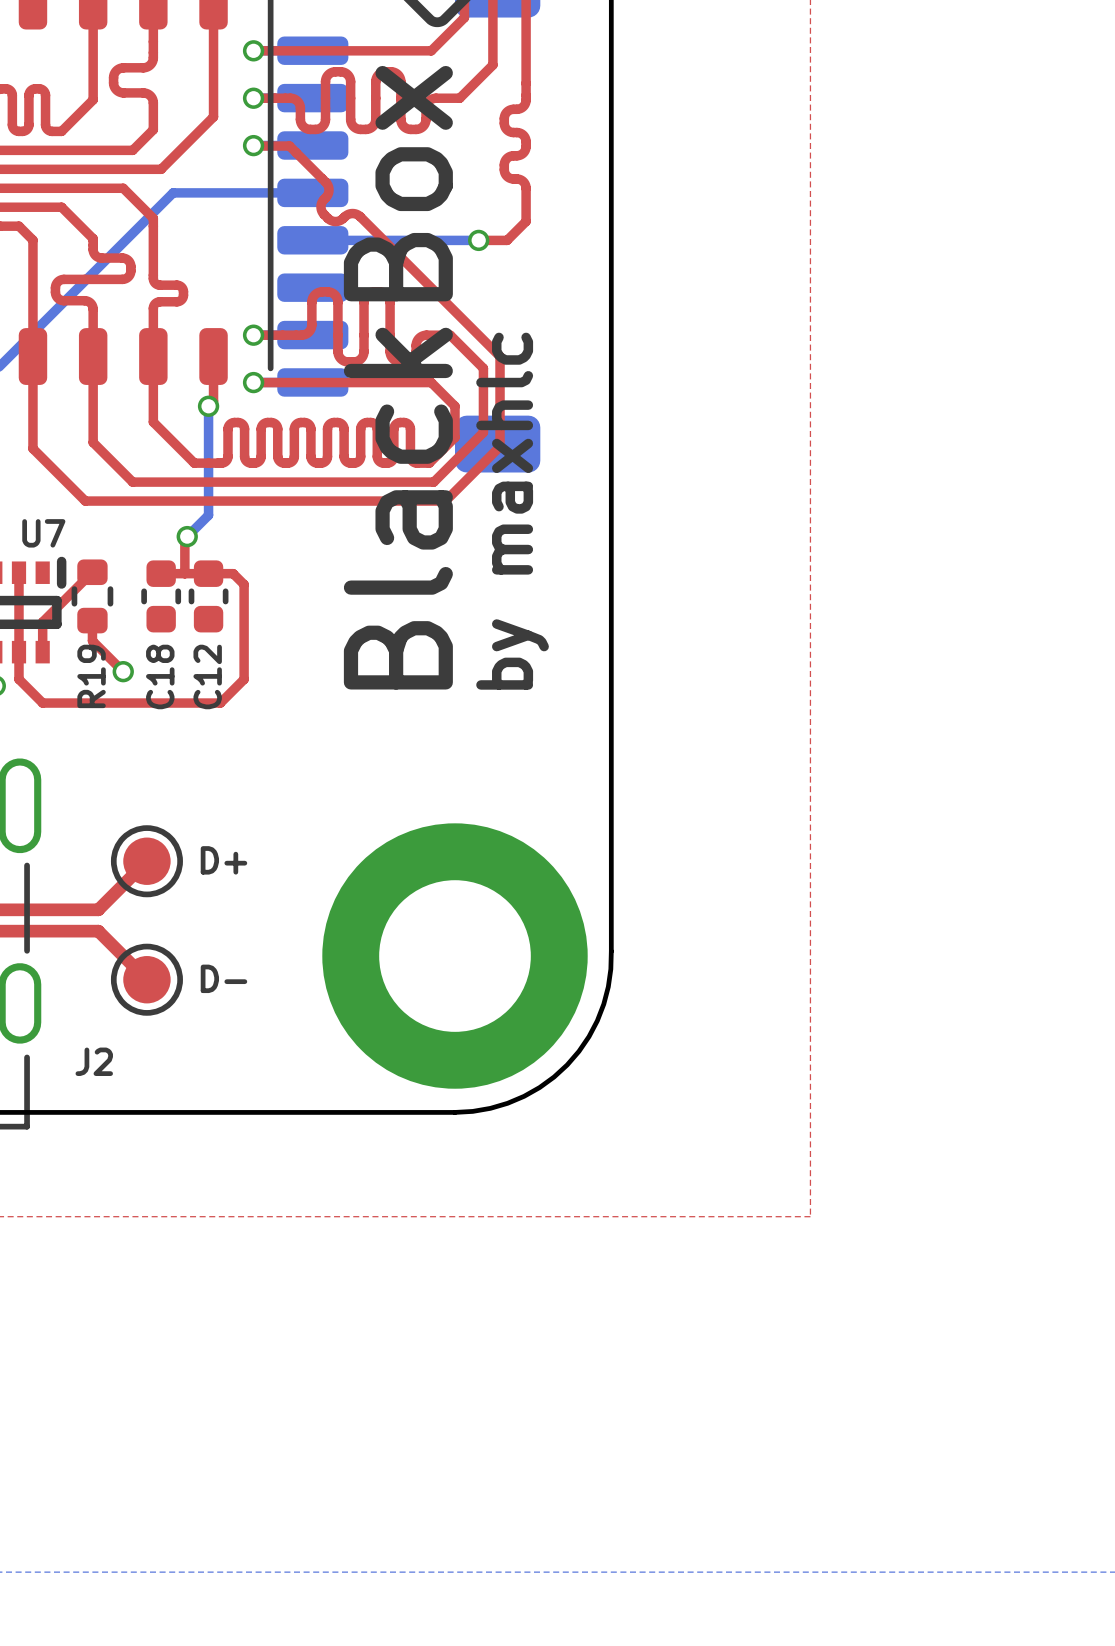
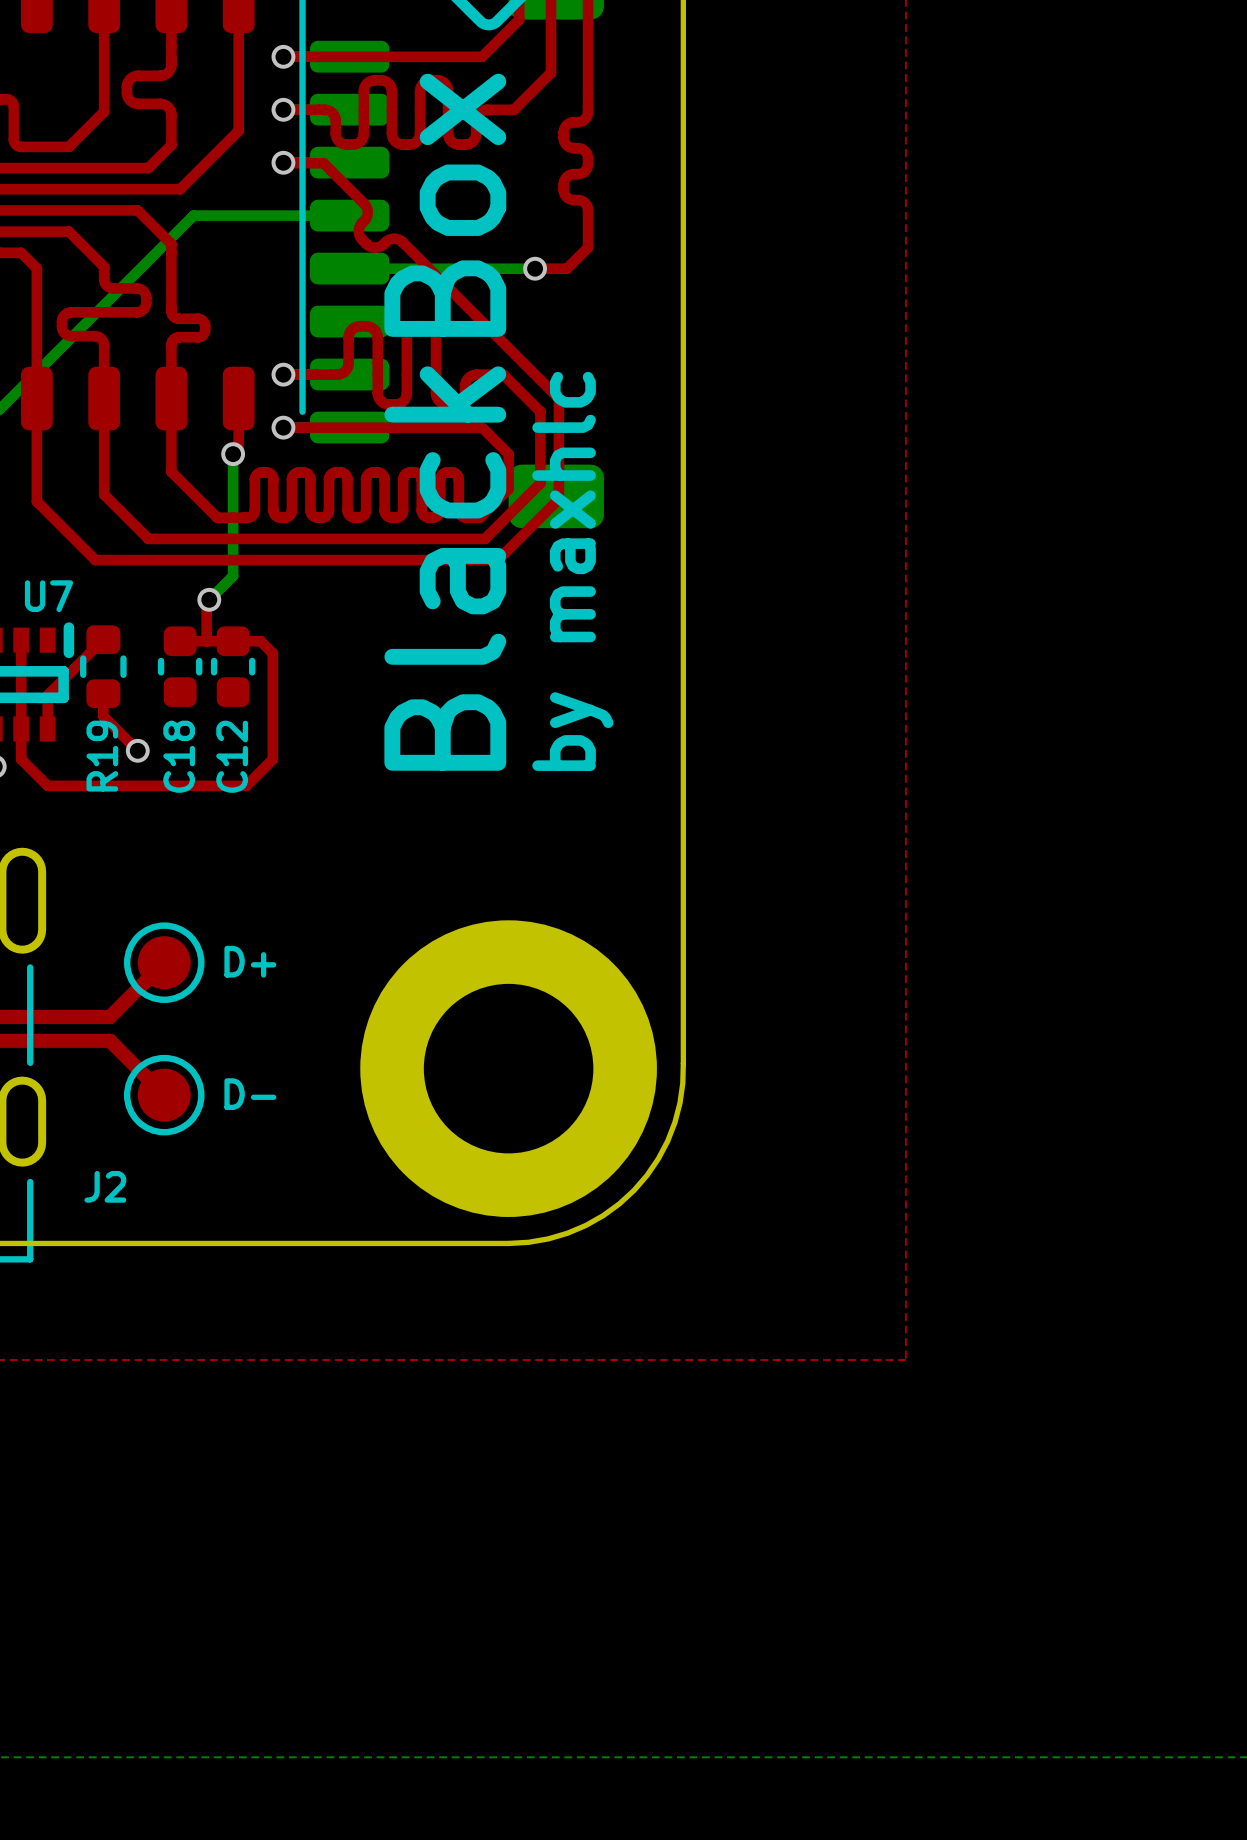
top track: (22, 131) (28, 126) (29, 93) (35, 88) (41, 89) (45, 93) (45, 126) (52, 131) -> (24, 146) (58, 146)

